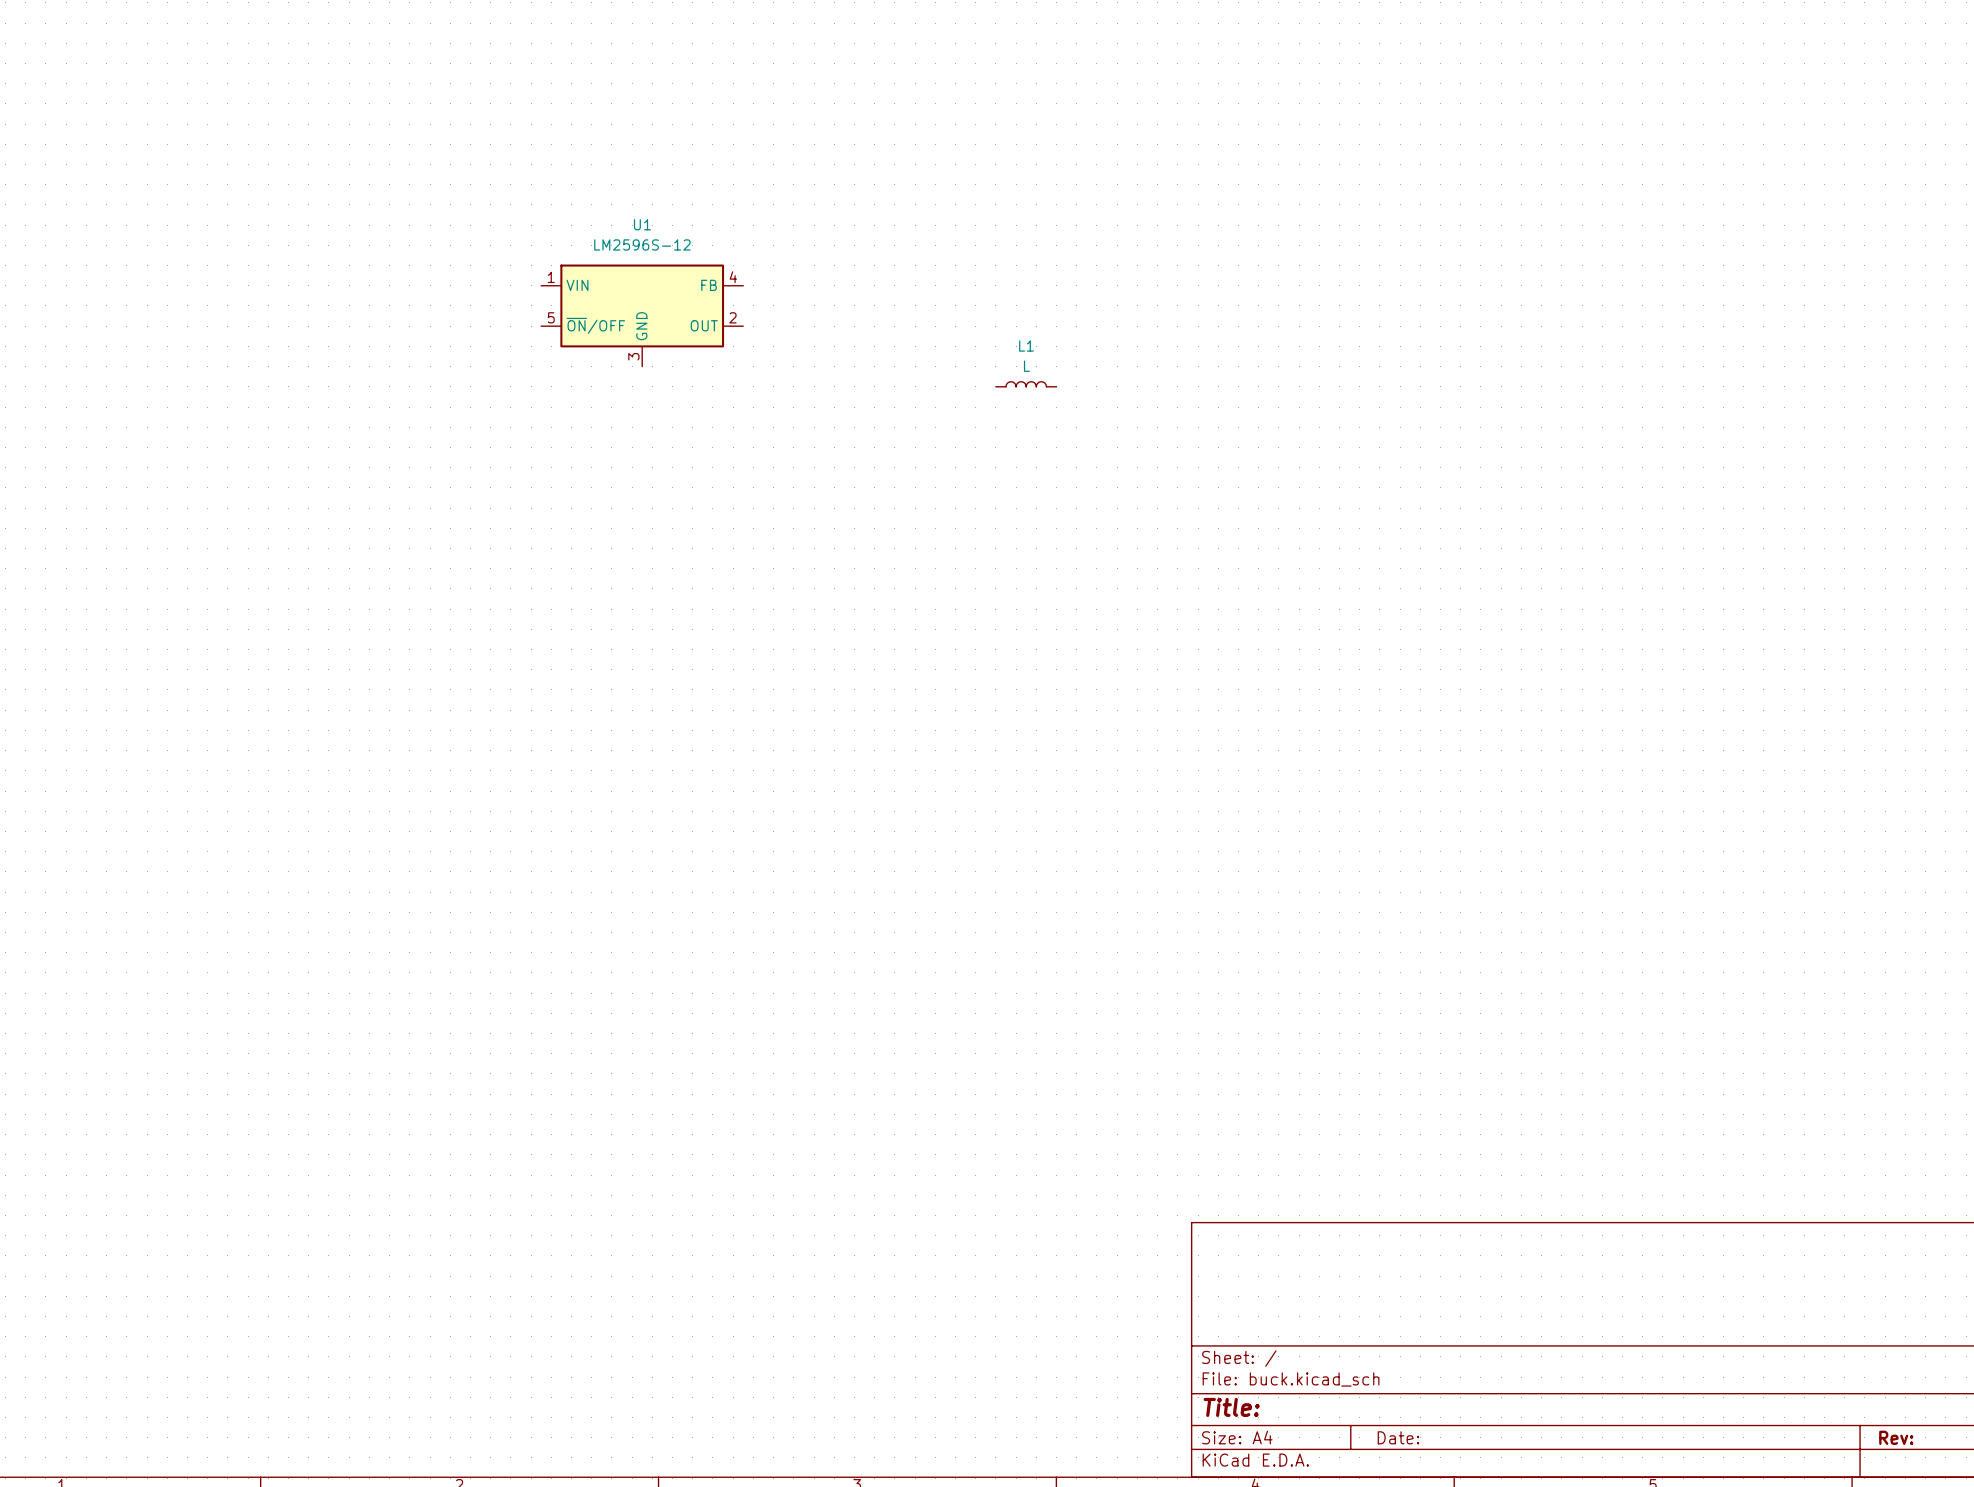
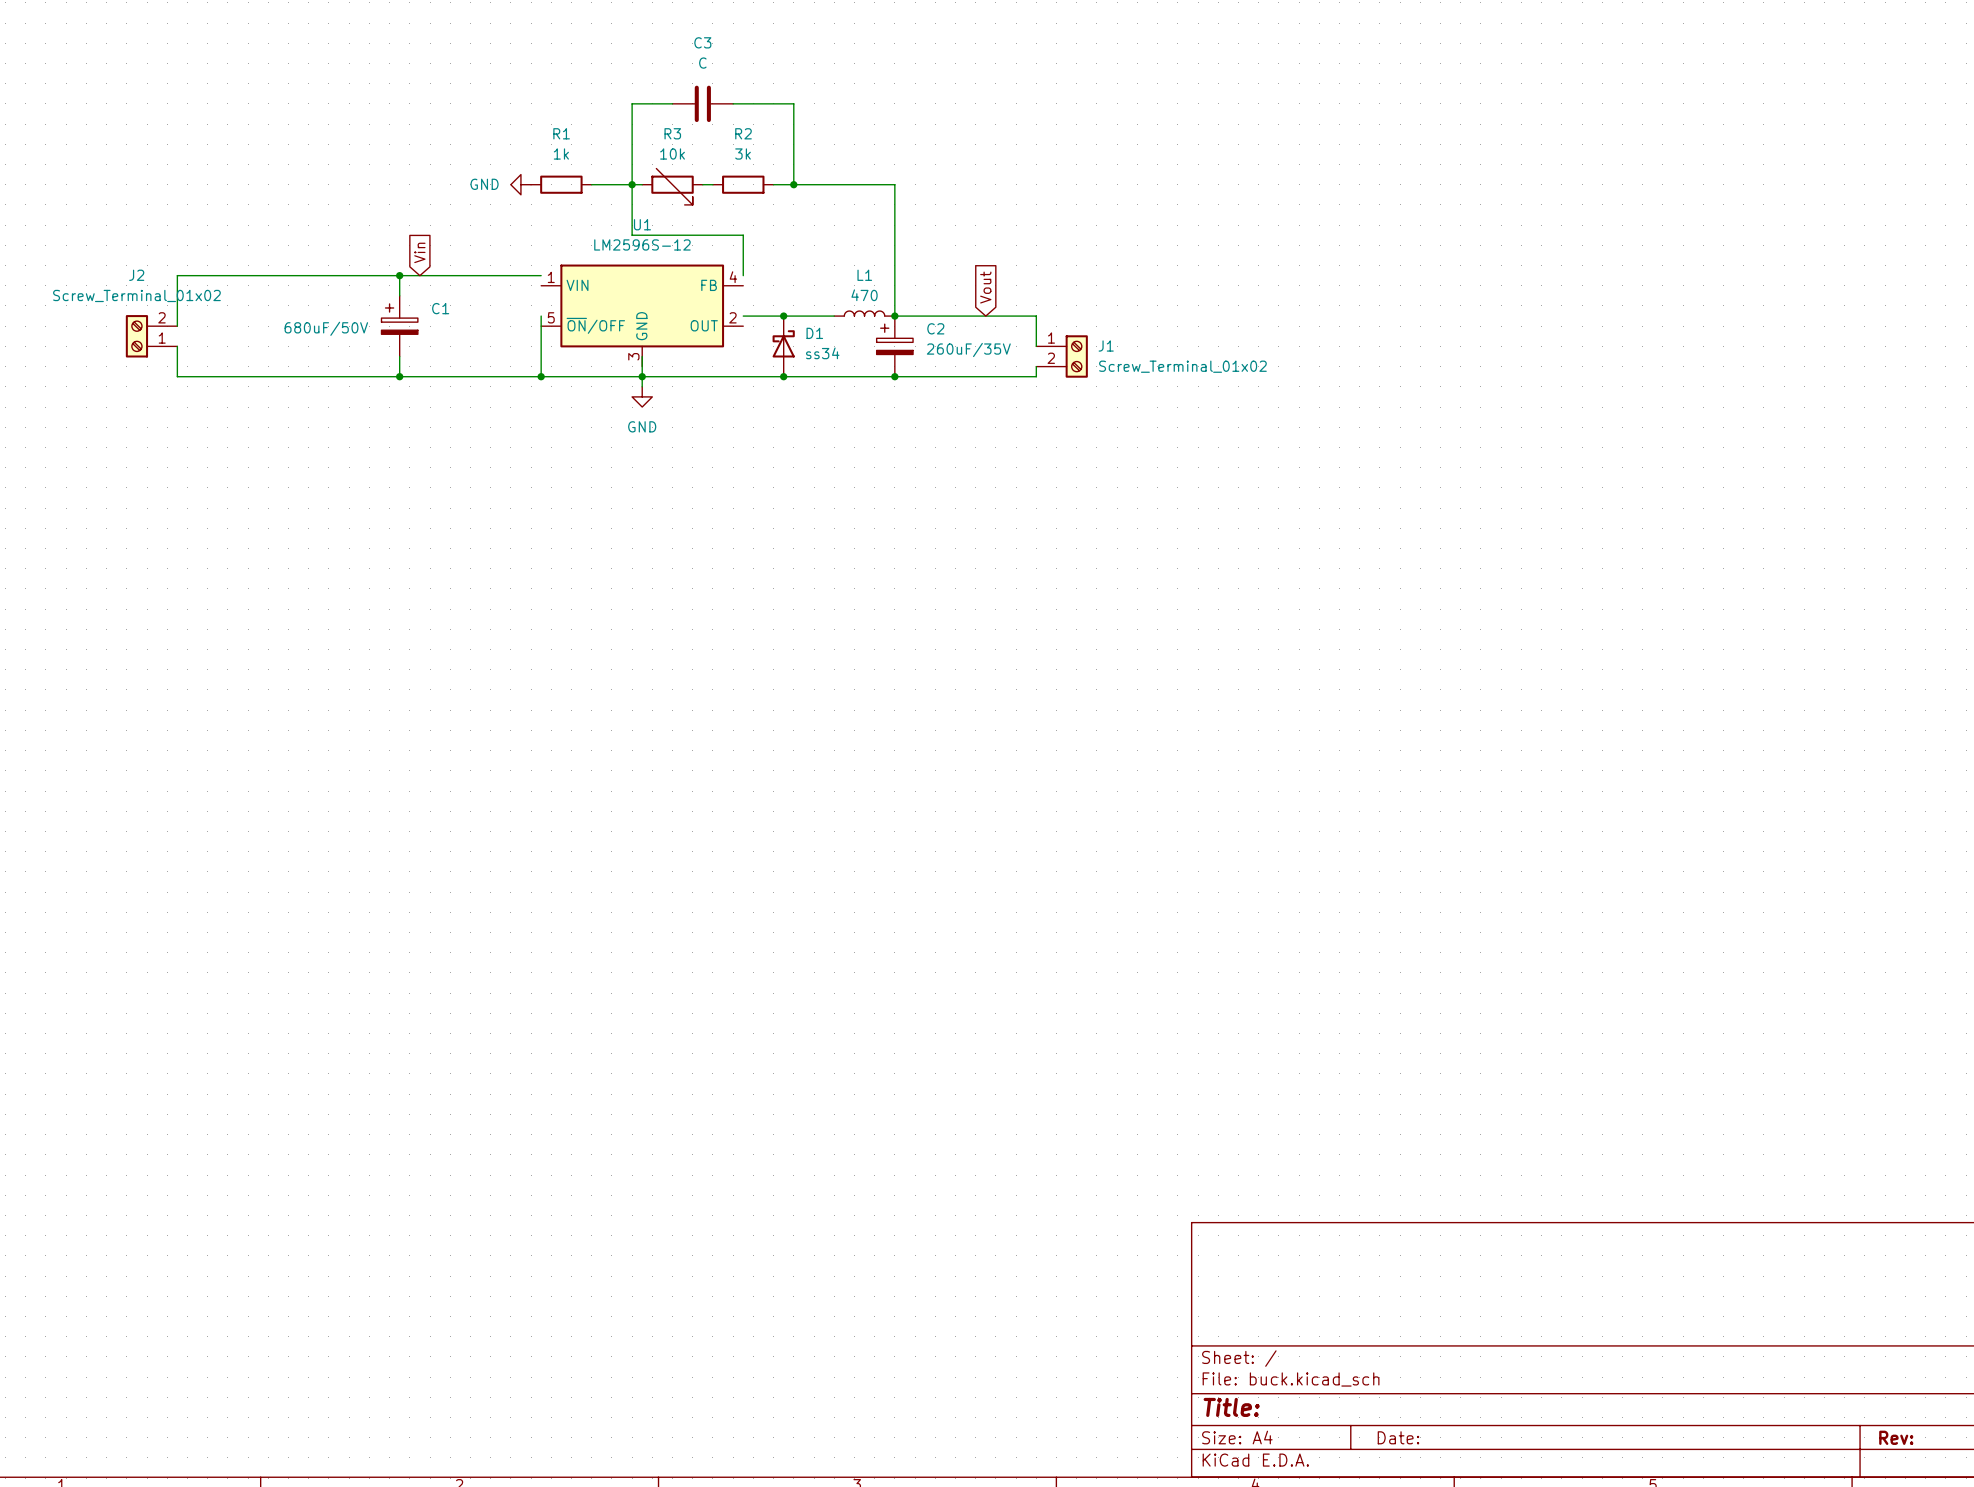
wire: none -> (672, 103) (632, 103) (632, 235) (743, 235) (743, 275)
C3: none -> C (702, 103)
wire: none -> (733, 103) (793, 103) (793, 184)
power symbol: none -> GND (520, 184)
R1: none -> 1k (561, 184)
wire: none -> (591, 184) (642, 184)
junction: none -> (632, 184)
wire: none -> (702, 184) (712, 184)
R2: none -> 3k (743, 184)
wire: none -> (773, 184) (894, 184) (894, 316) (1036, 316) (1036, 346)
junction: none -> (793, 184)
R3: none -> 10k (672, 186)
global label: none -> Vin (419, 252)
wire: none -> (399, 275) (399, 295)
junction: none -> (399, 275)
wire: none -> (541, 275) (177, 275) (177, 326)
global label: none -> Vout (985, 287)
wire: none -> (541, 316) (541, 376)
wire: none -> (743, 316) (834, 316)
junction: none -> (783, 316)
junction: none -> (894, 316)
C1: none -> 680uF/50V (399, 326)
J2: none -> Screw_Terminal_01x02 (151, 336)
wire: none -> (177, 346) (177, 376) (1036, 376) (1036, 366)
D1: none -> ss34 (783, 346)
C2: none -> 260uF/35V (894, 346)
wire: none -> (399, 356) (399, 376)
wire: none -> (642, 356) (642, 386)
J1: none -> Screw_Terminal_01x02 (1062, 356)
L1 value: L (1026, 366) -> 470 (864, 295)
junction: none -> (399, 376)
junction: none -> (541, 376)
junction: none -> (642, 376)
junction: none -> (783, 376)
junction: none -> (894, 376)
L1 position: (1026, 384) -> (864, 313)
power symbol: none -> GND (642, 396)

